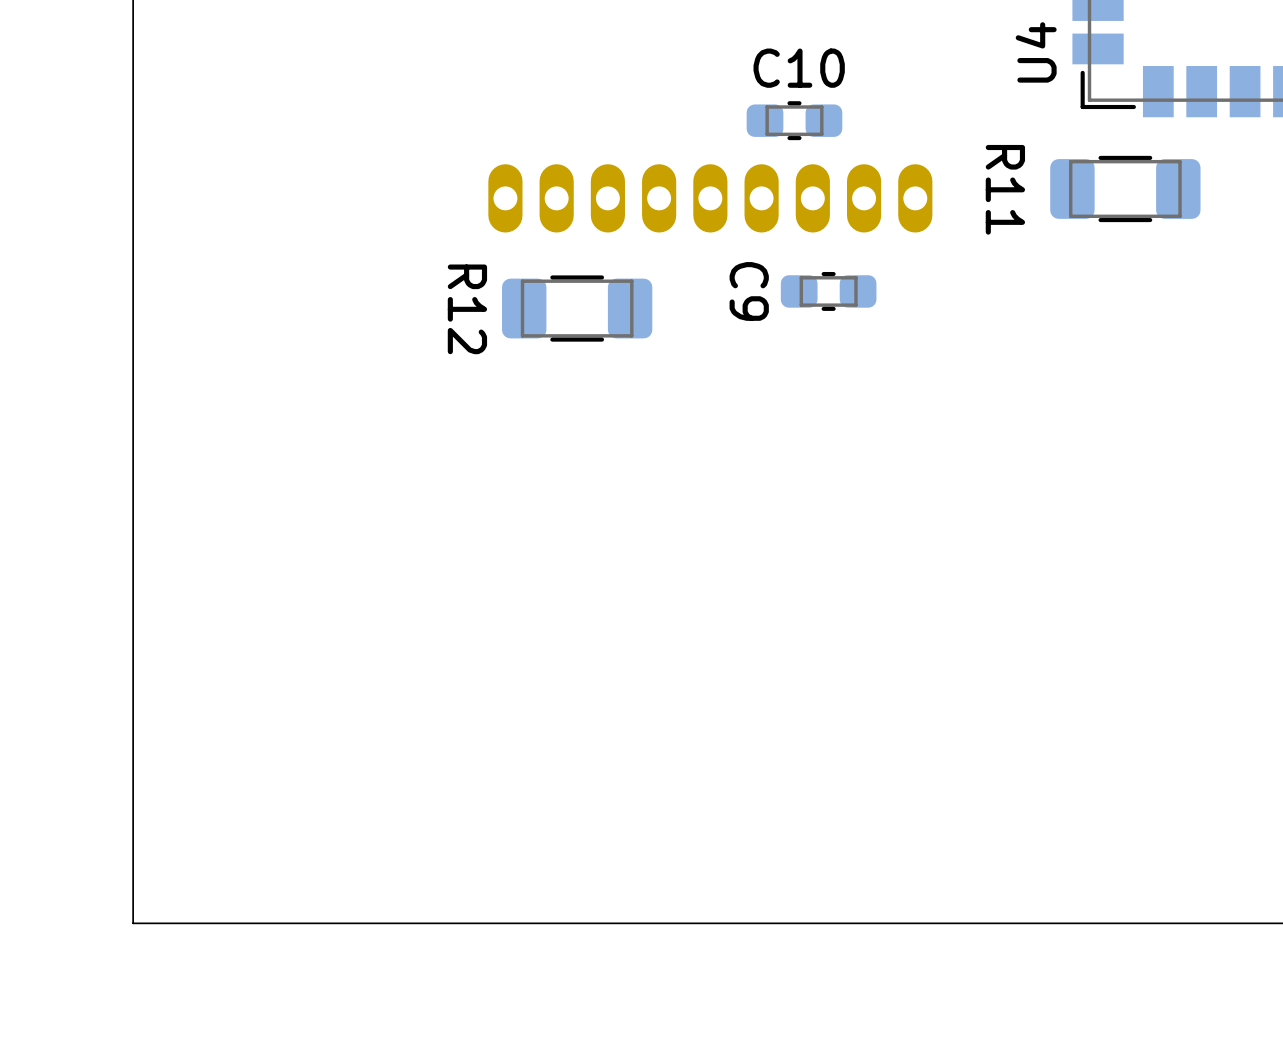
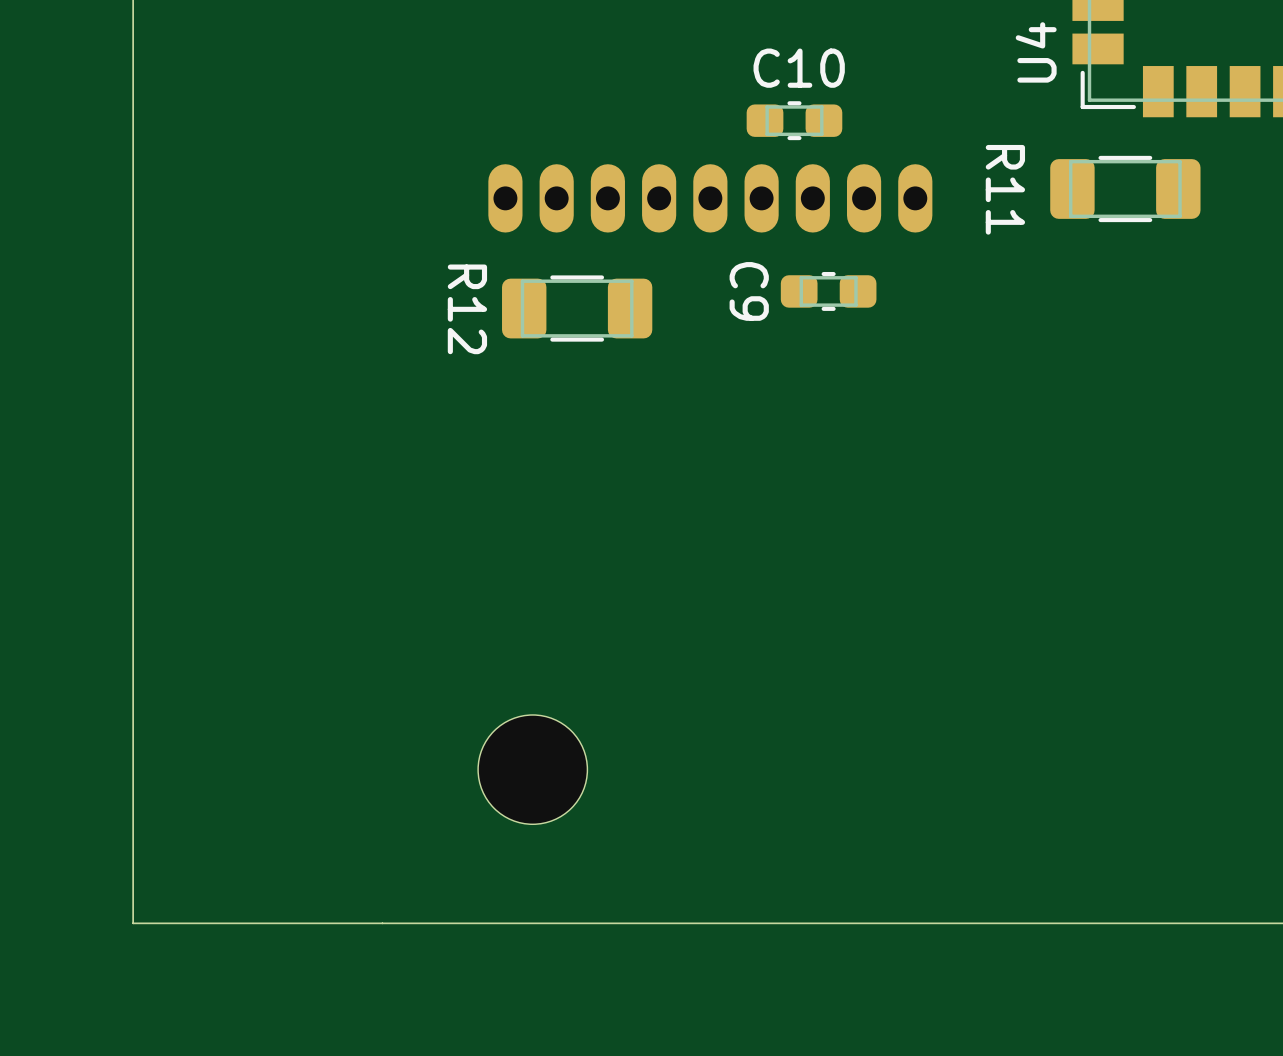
part: none -> (532, 769)

